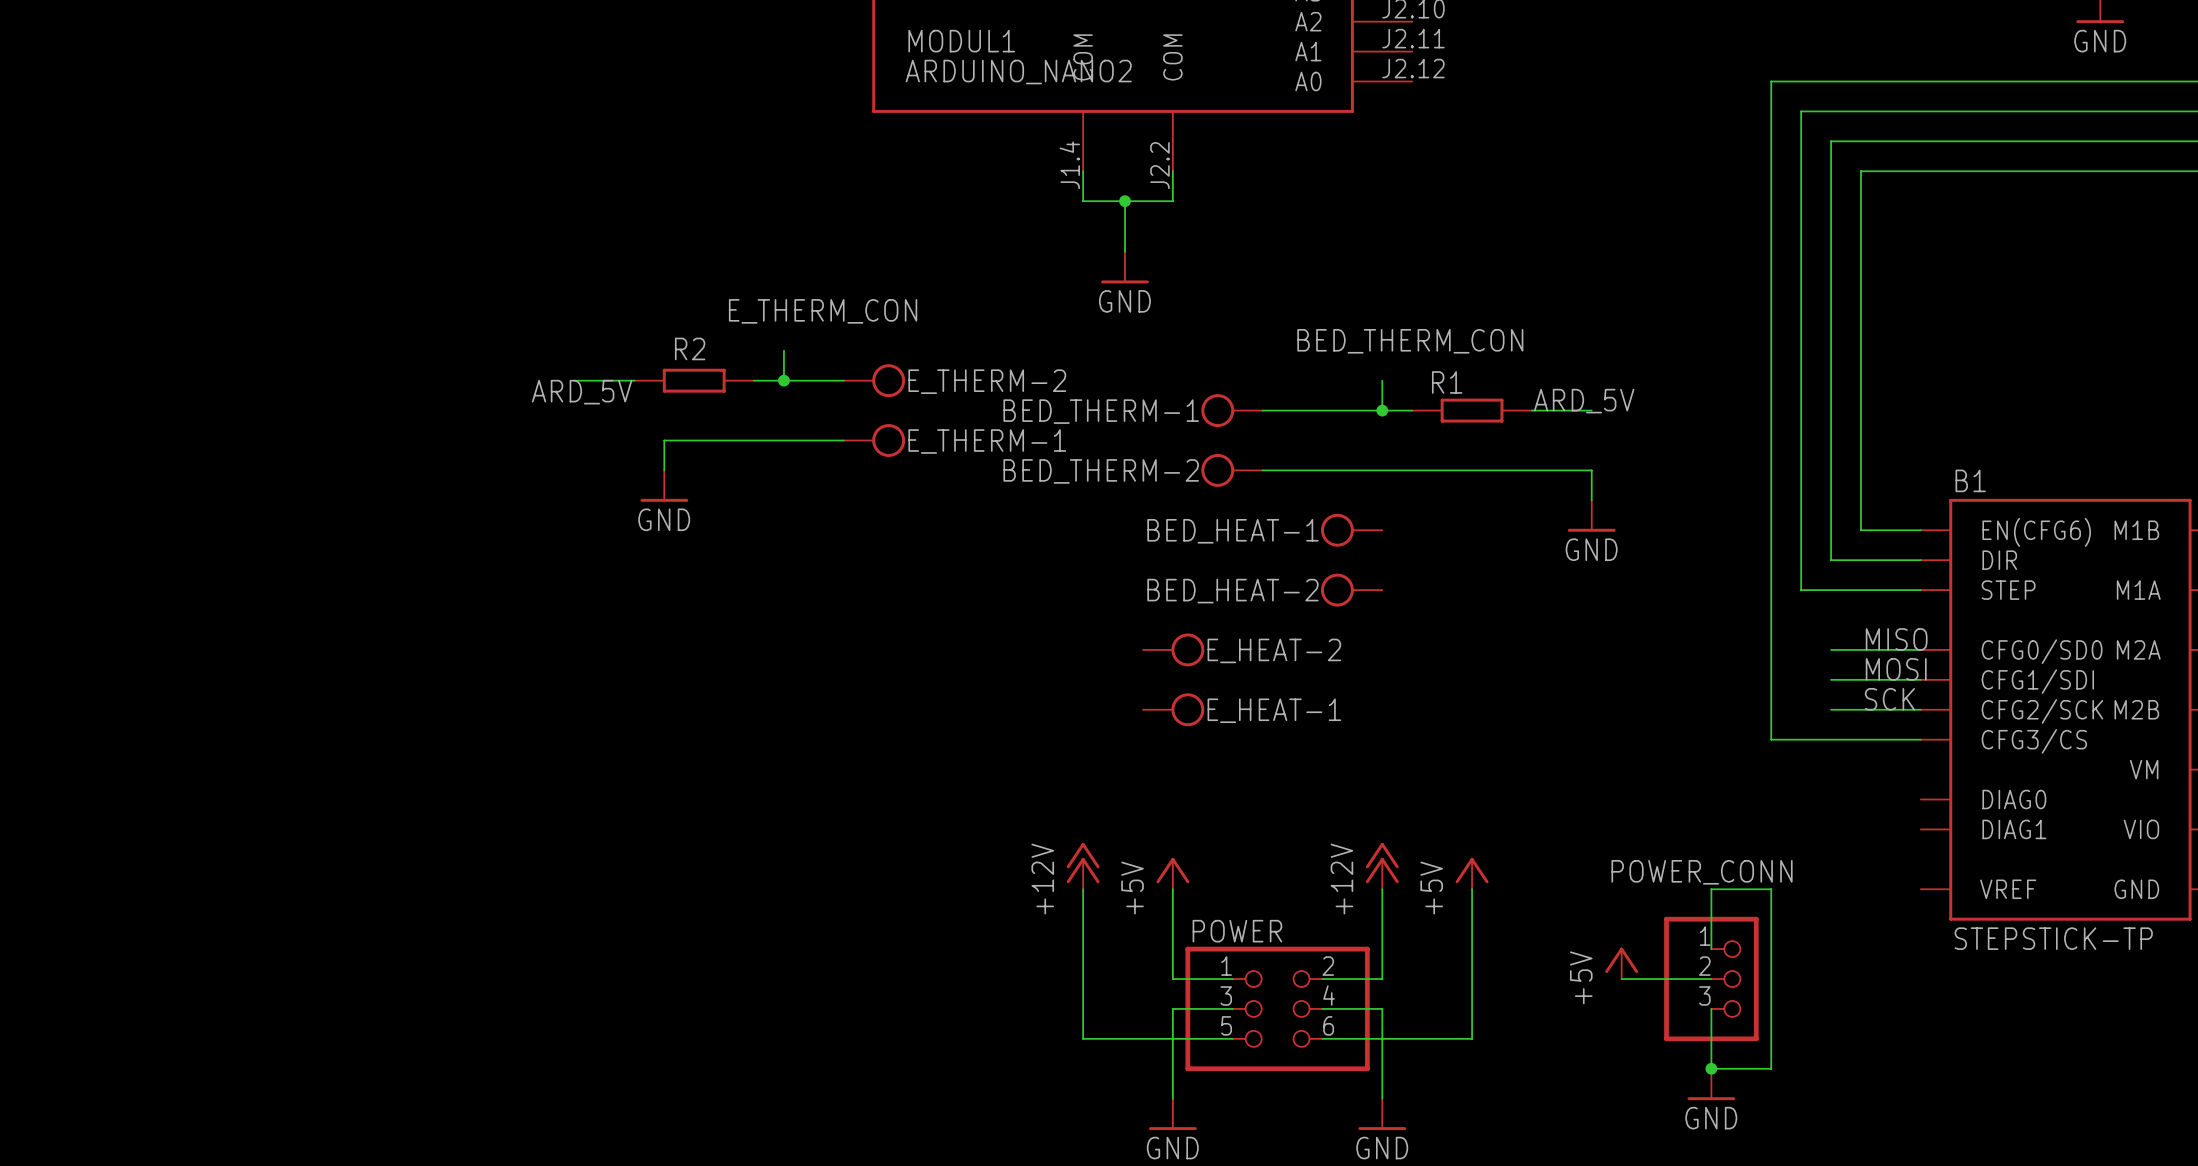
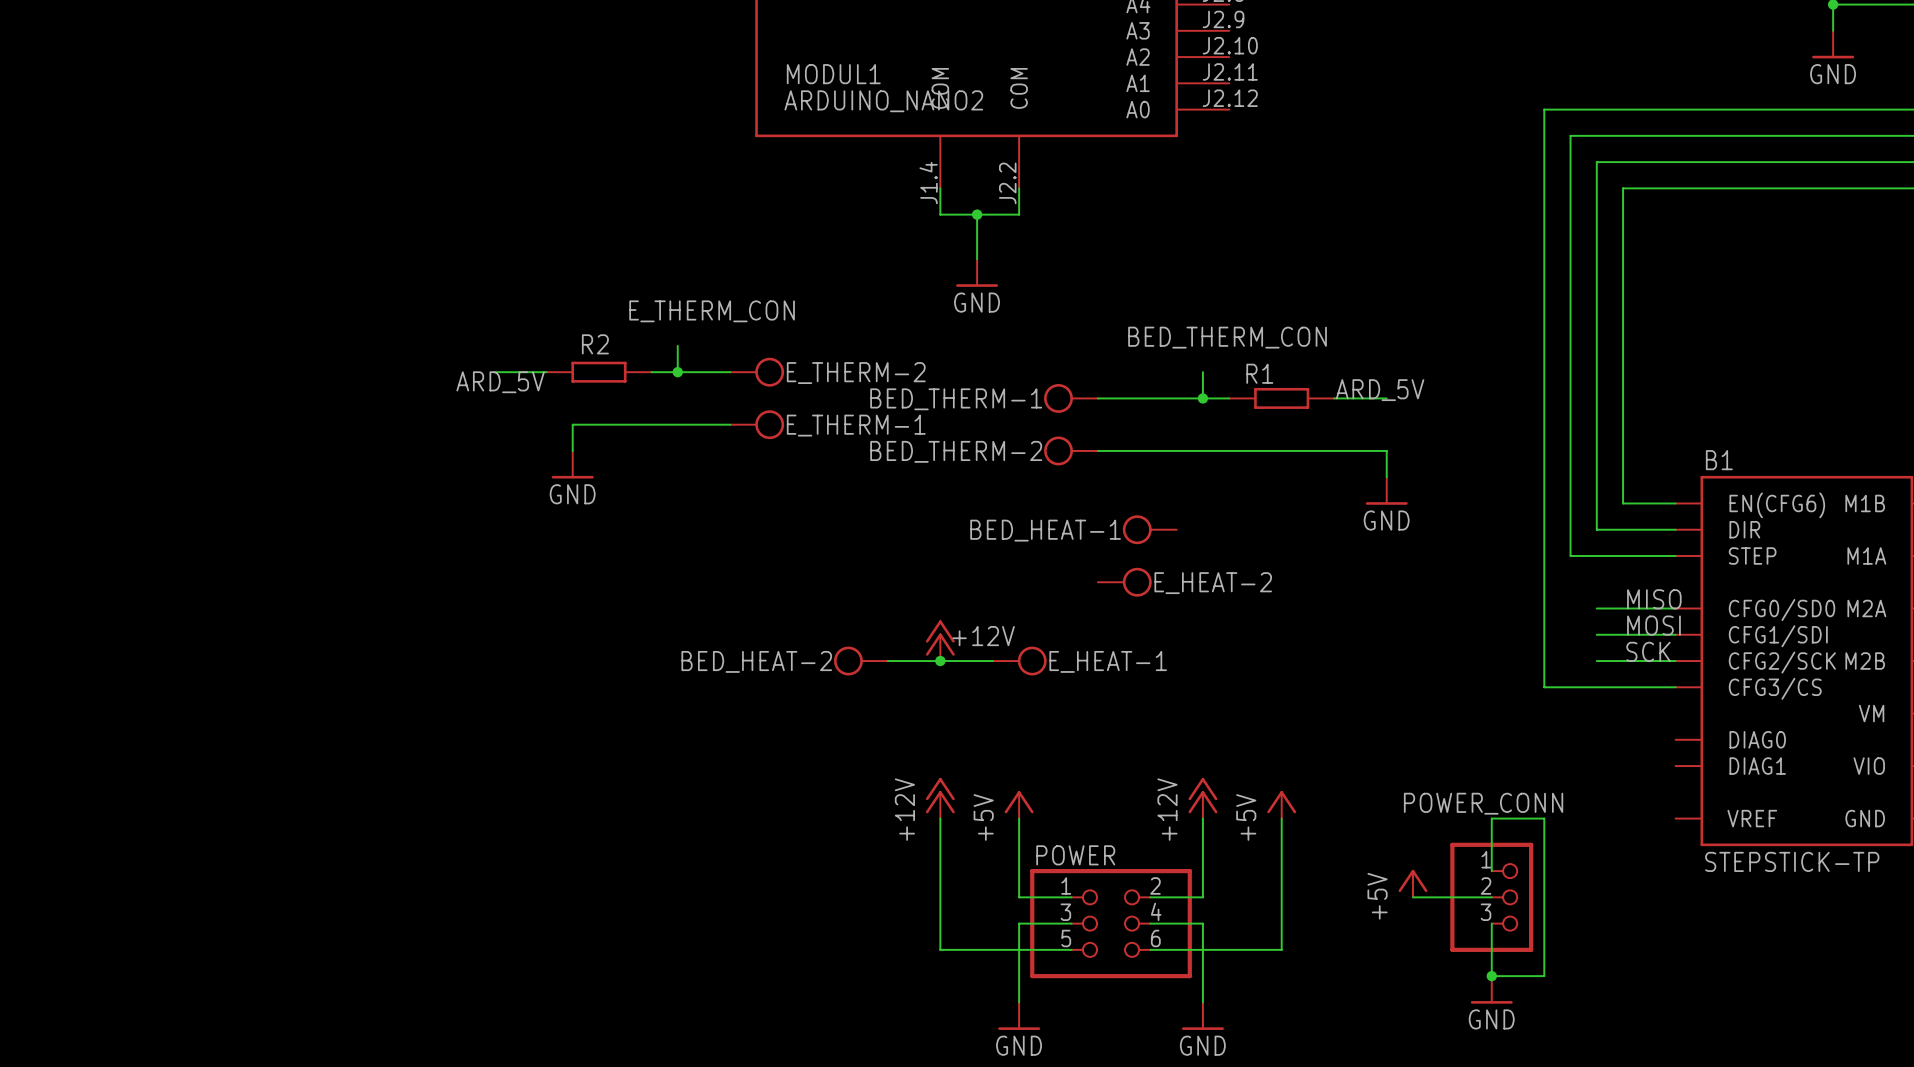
BED_HEAT-1 position: (1351, 530) -> (1149, 529)
BED_HEAT-2 position: (1351, 590) -> (860, 661)
E_HEAT-2 position: (1173, 649) -> (1124, 582)
power symbol: none -> +12V (940, 640)
wire: none -> (887, 661) (992, 661)
junction: none -> (940, 661)

